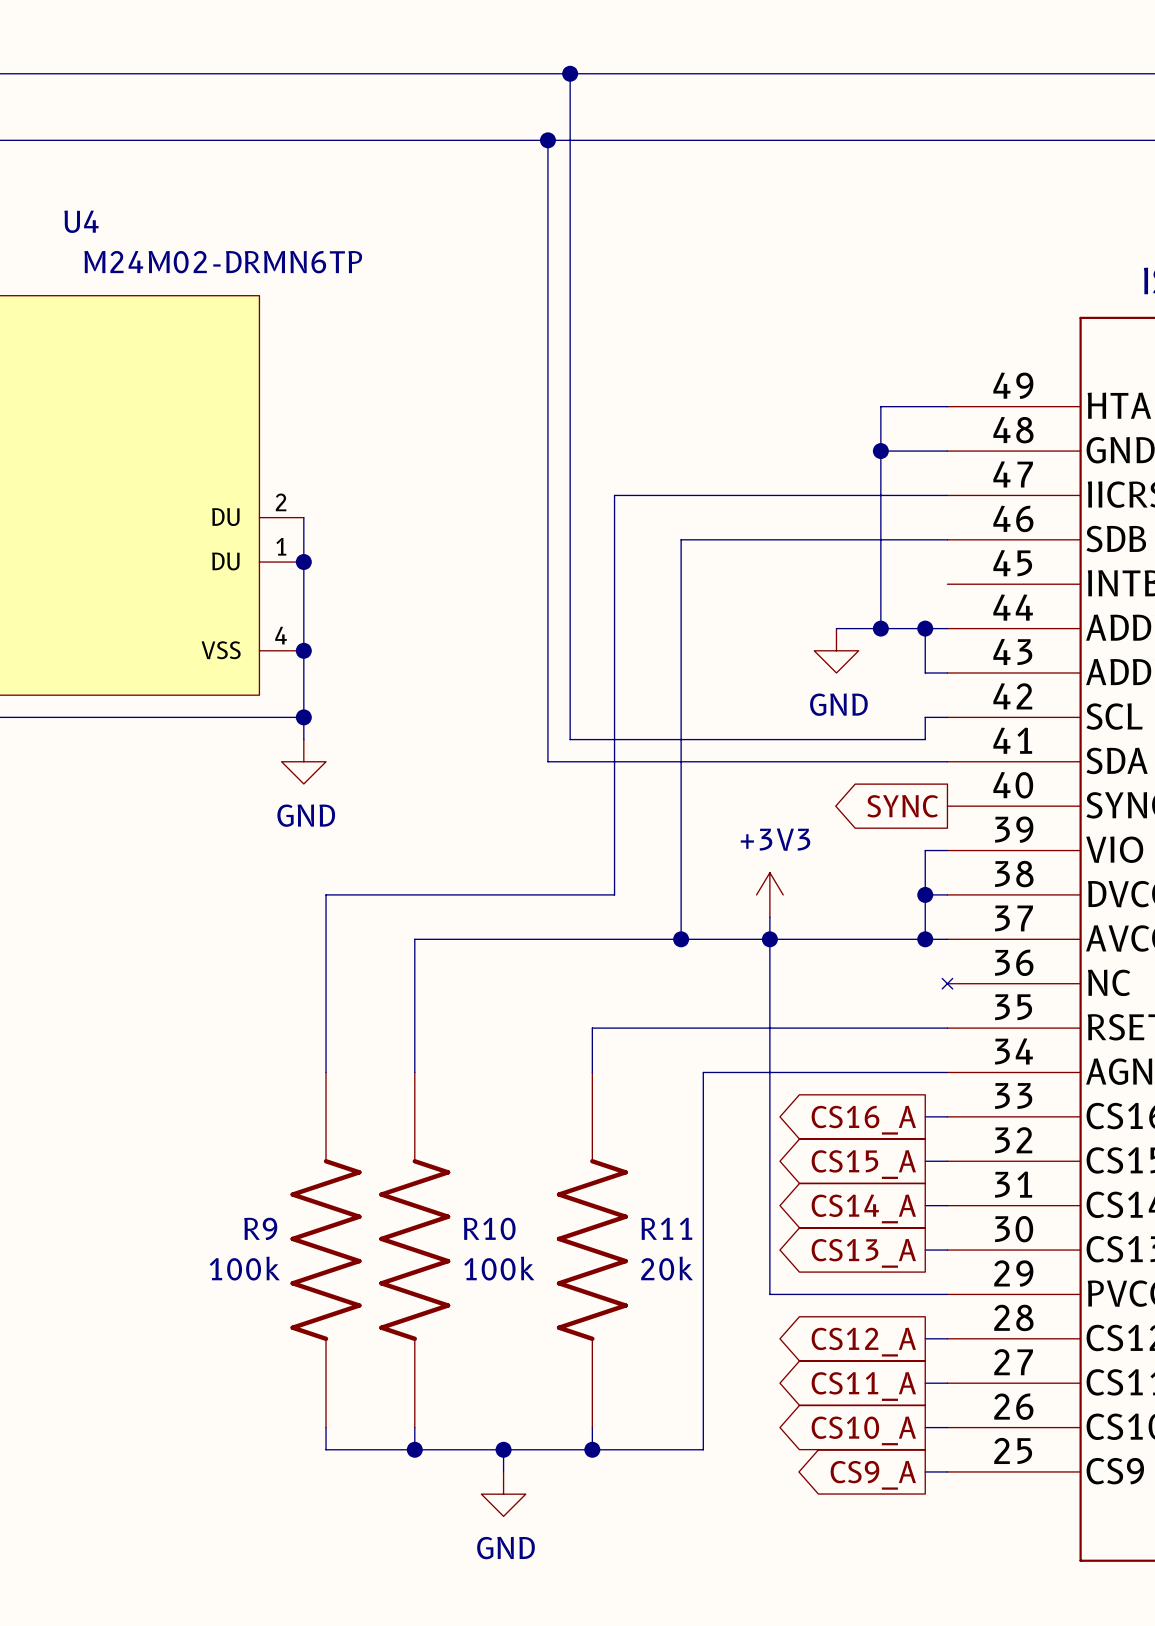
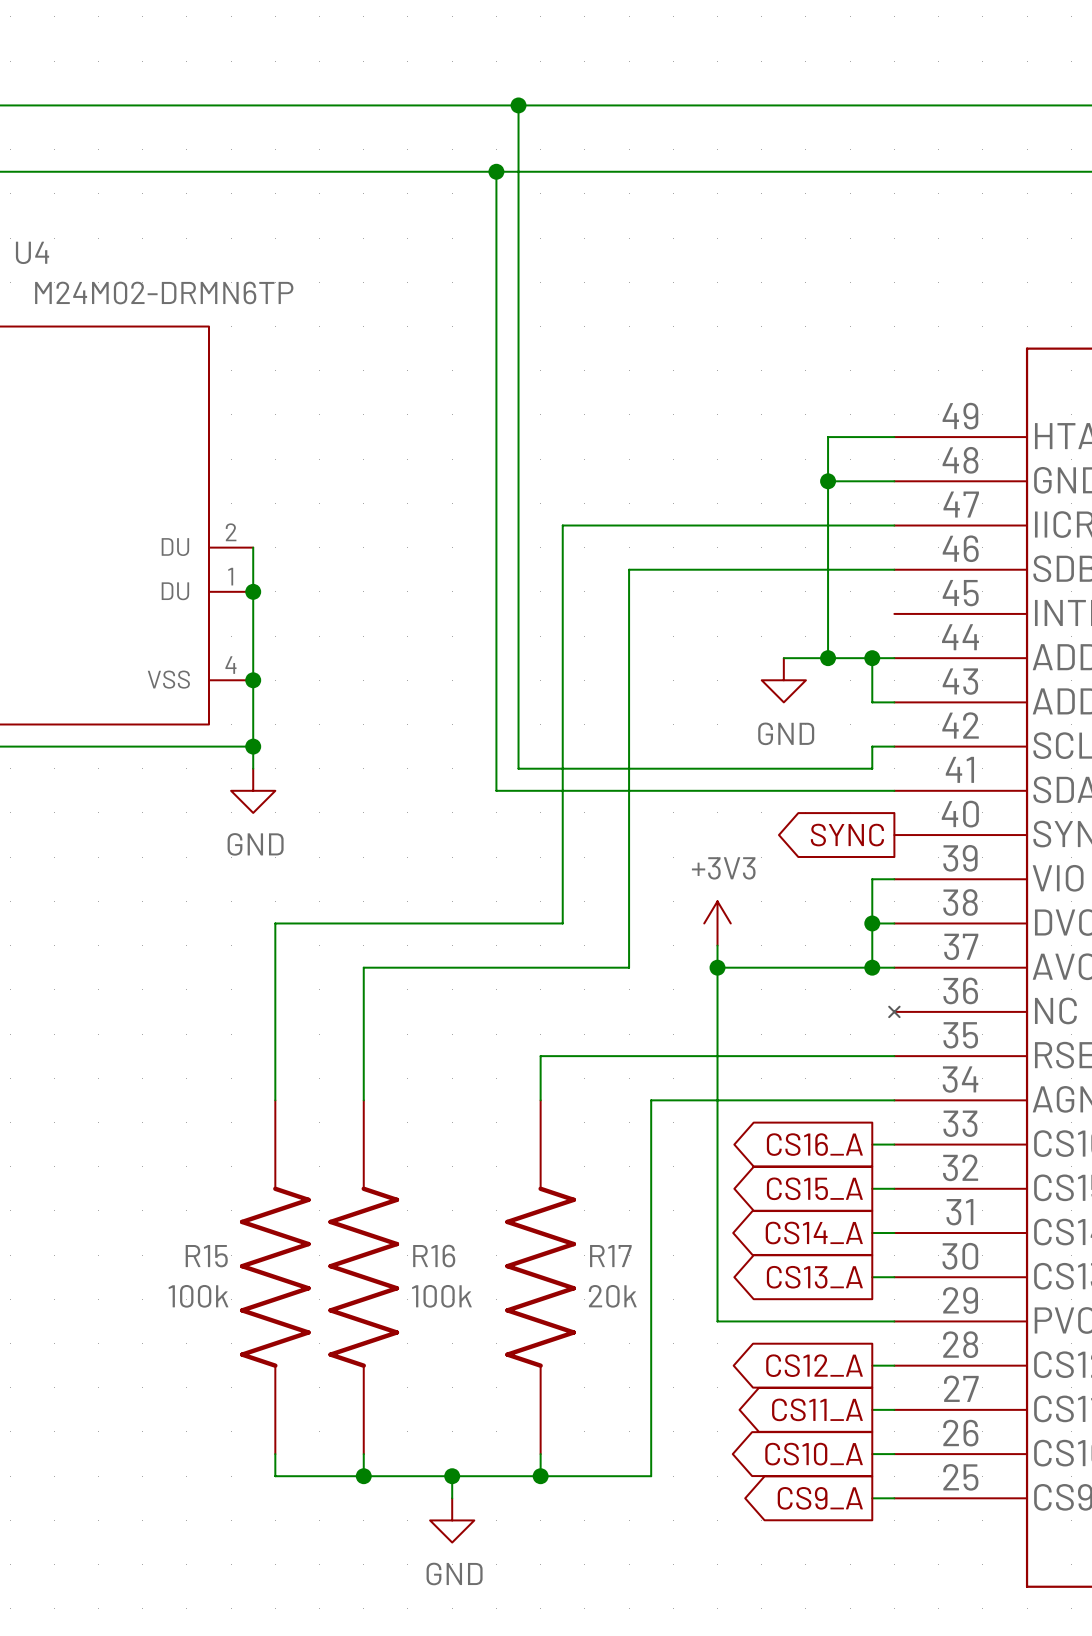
wire: (681, 939) (769, 939) -> none
junction: (681, 939) -> none
R9 name: R9 (260, 1228) -> R15 (206, 1256)
R10 name: R10 (489, 1228) -> R16 (434, 1256)
R11 name: R11 (666, 1228) -> R17 (610, 1256)

